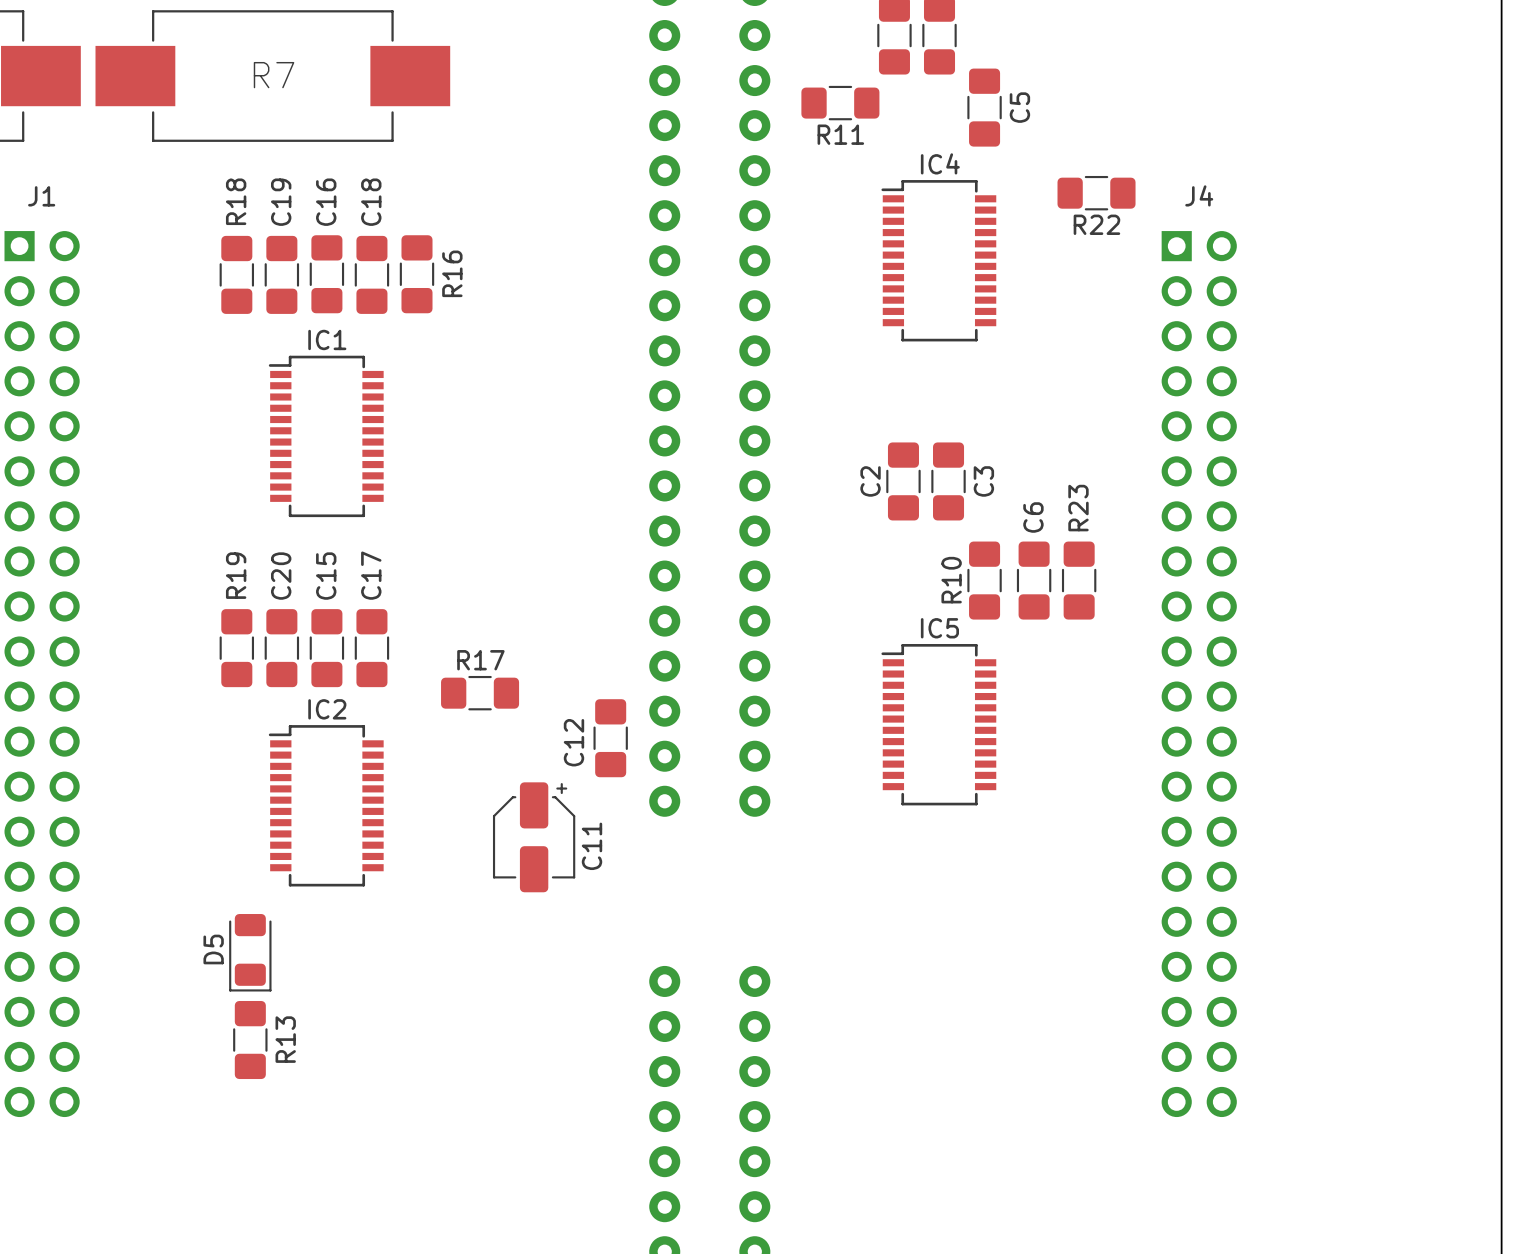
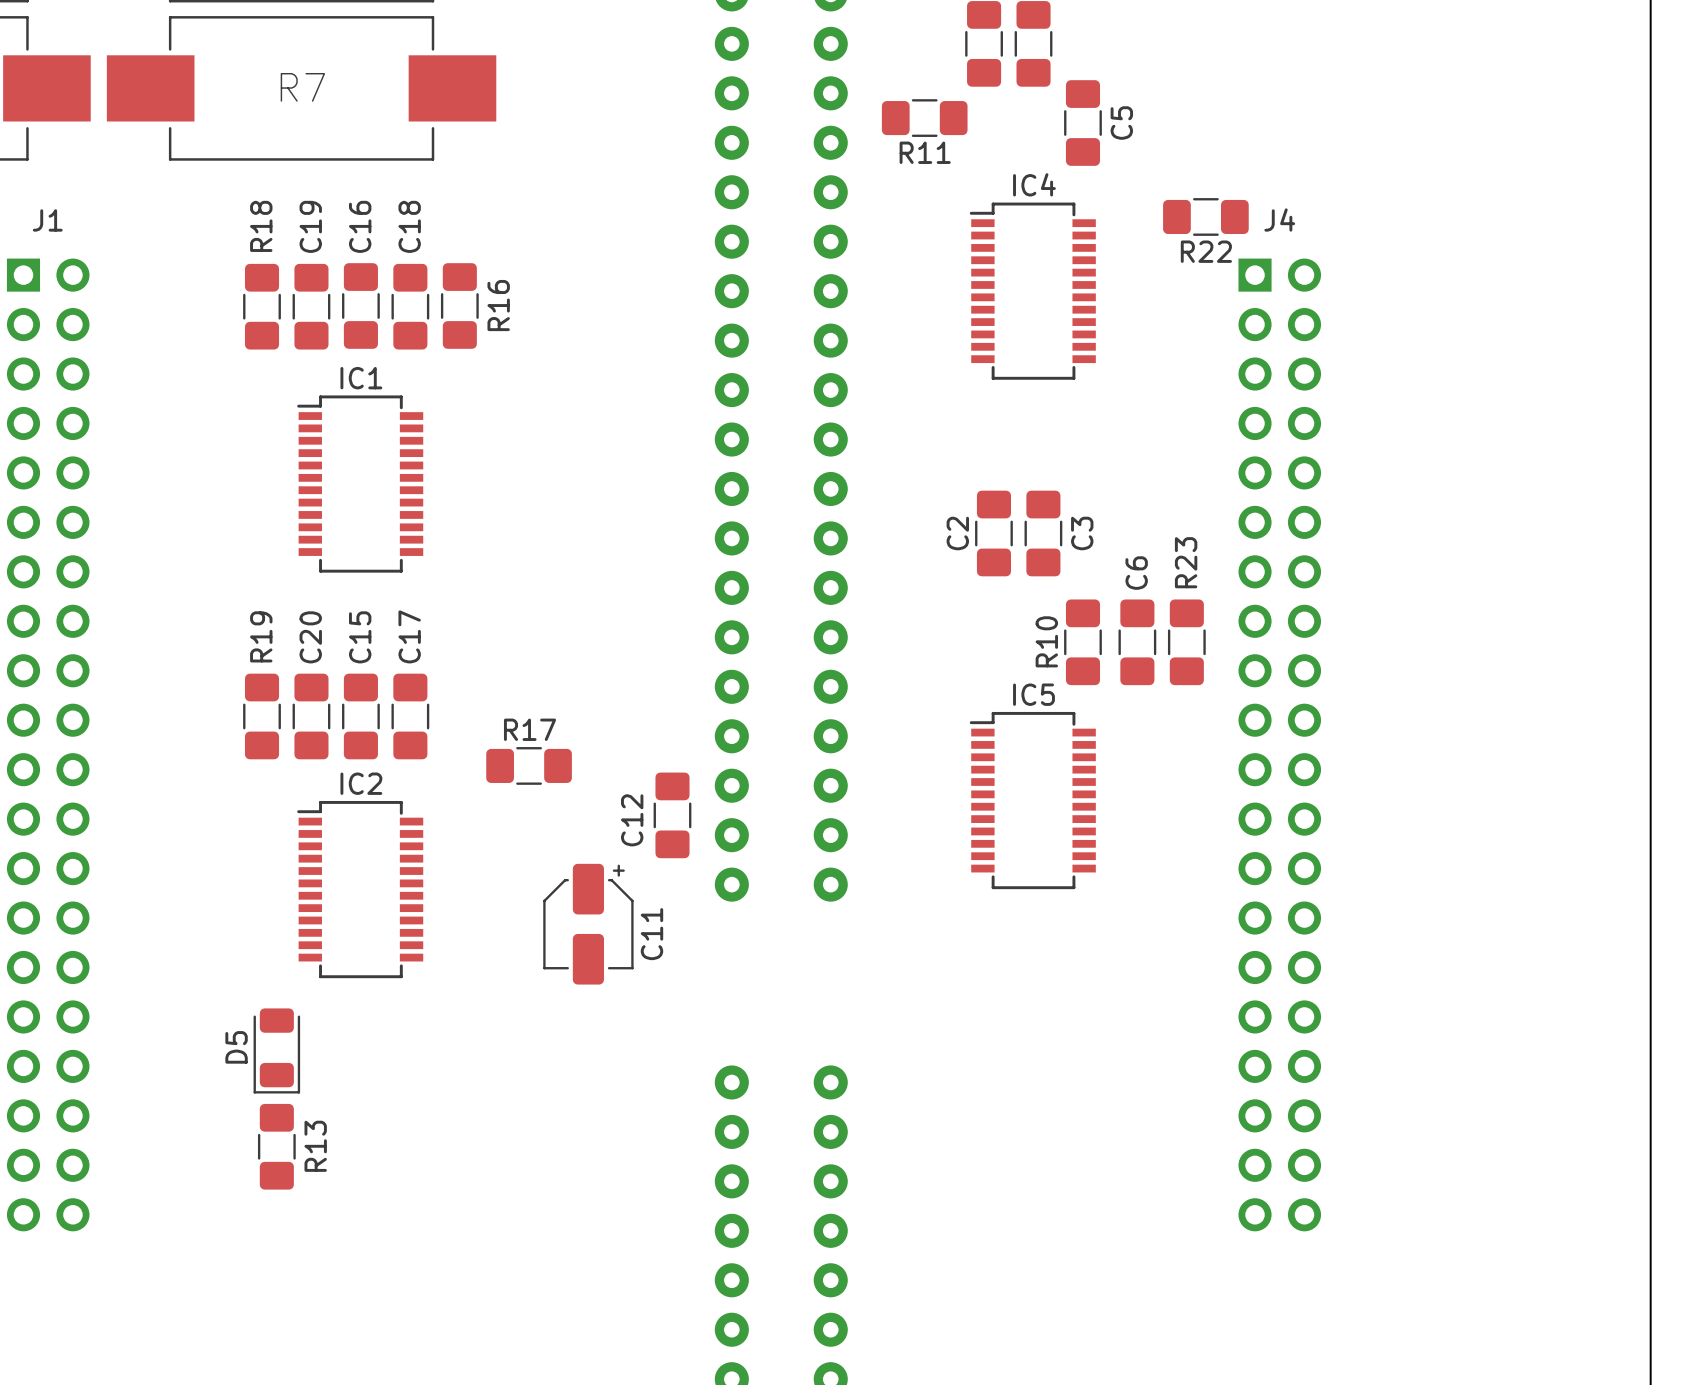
J4 position: (1199, 674) -> (1279, 744)

